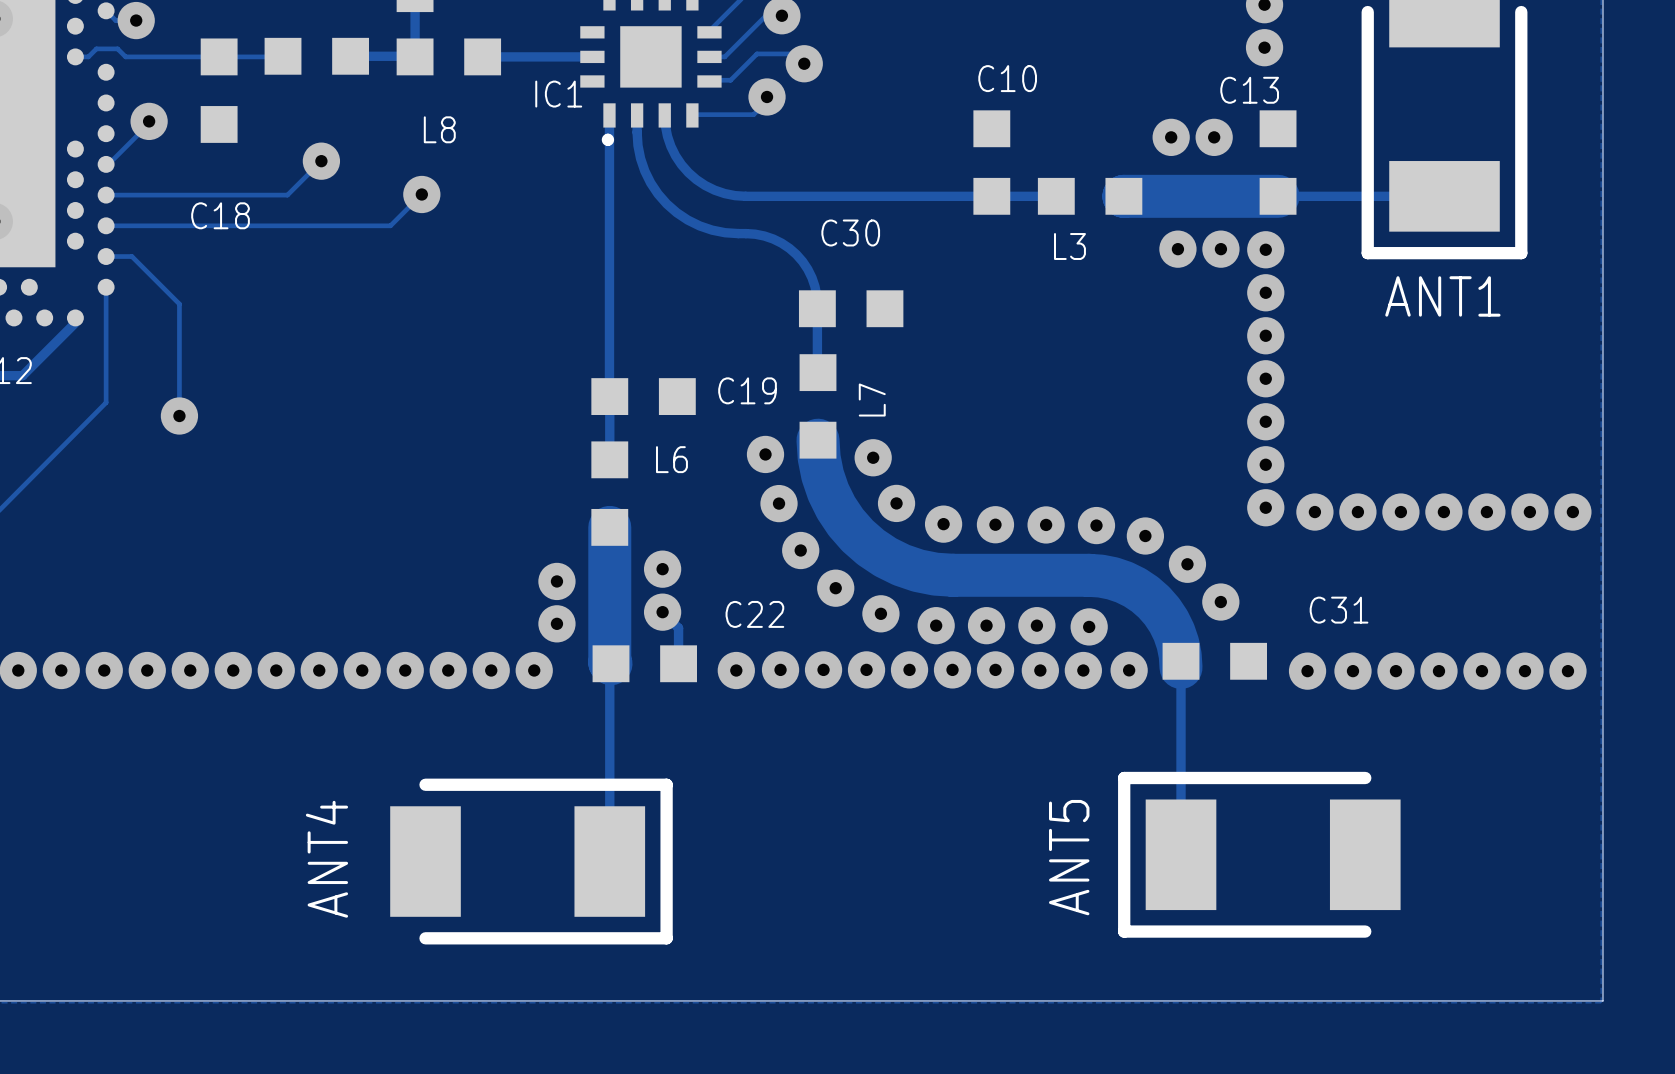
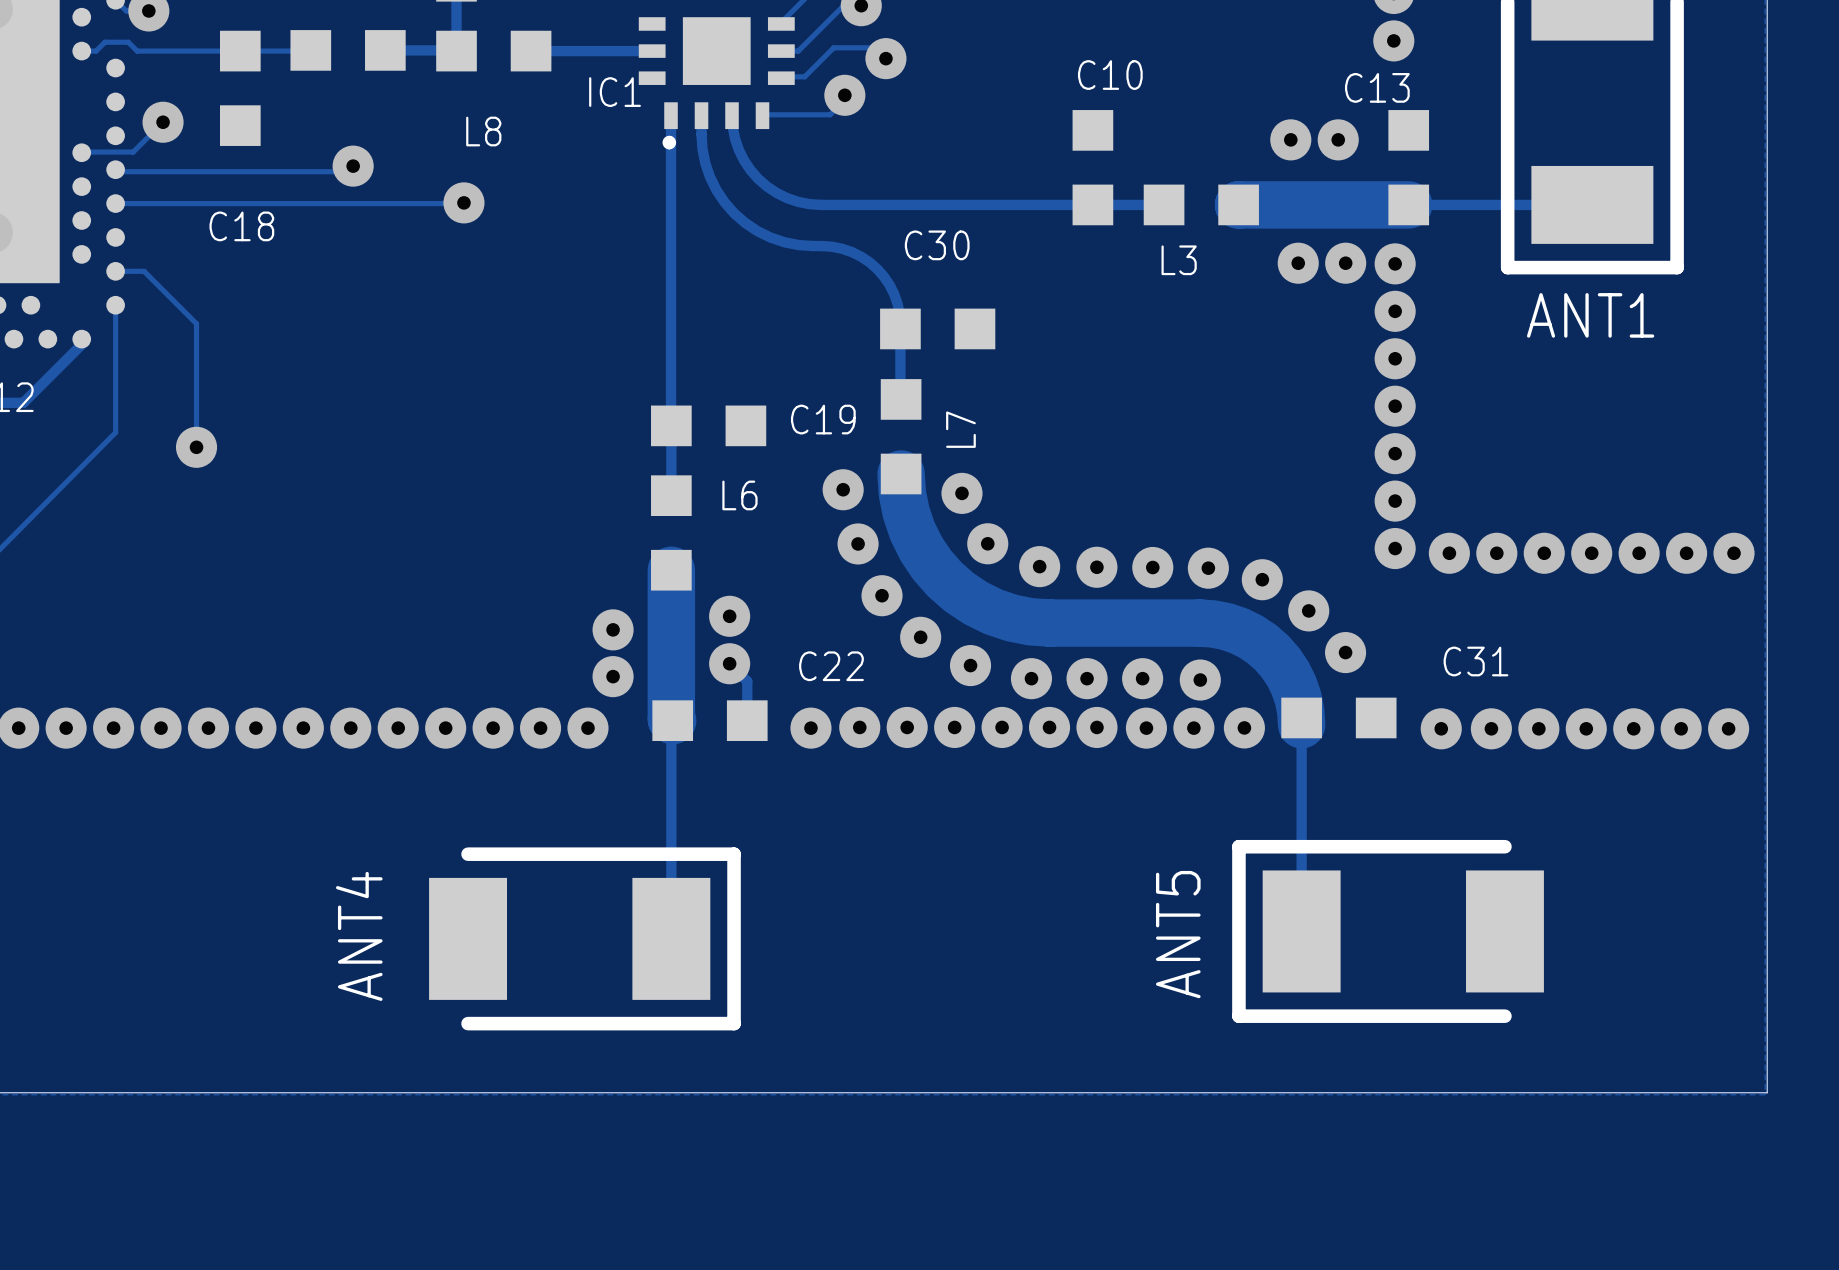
track: (149, 121) (149, 123) (108, 164) (106, 164) -> (163, 122) (133, 152) (83, 152)
track: none -> (115, 169) (117, 171) (347, 171)
track: (316, 166) (287, 195) -> (463, 203) (315, 203)
track: (421, 195) (390, 225) (106, 225) -> none

